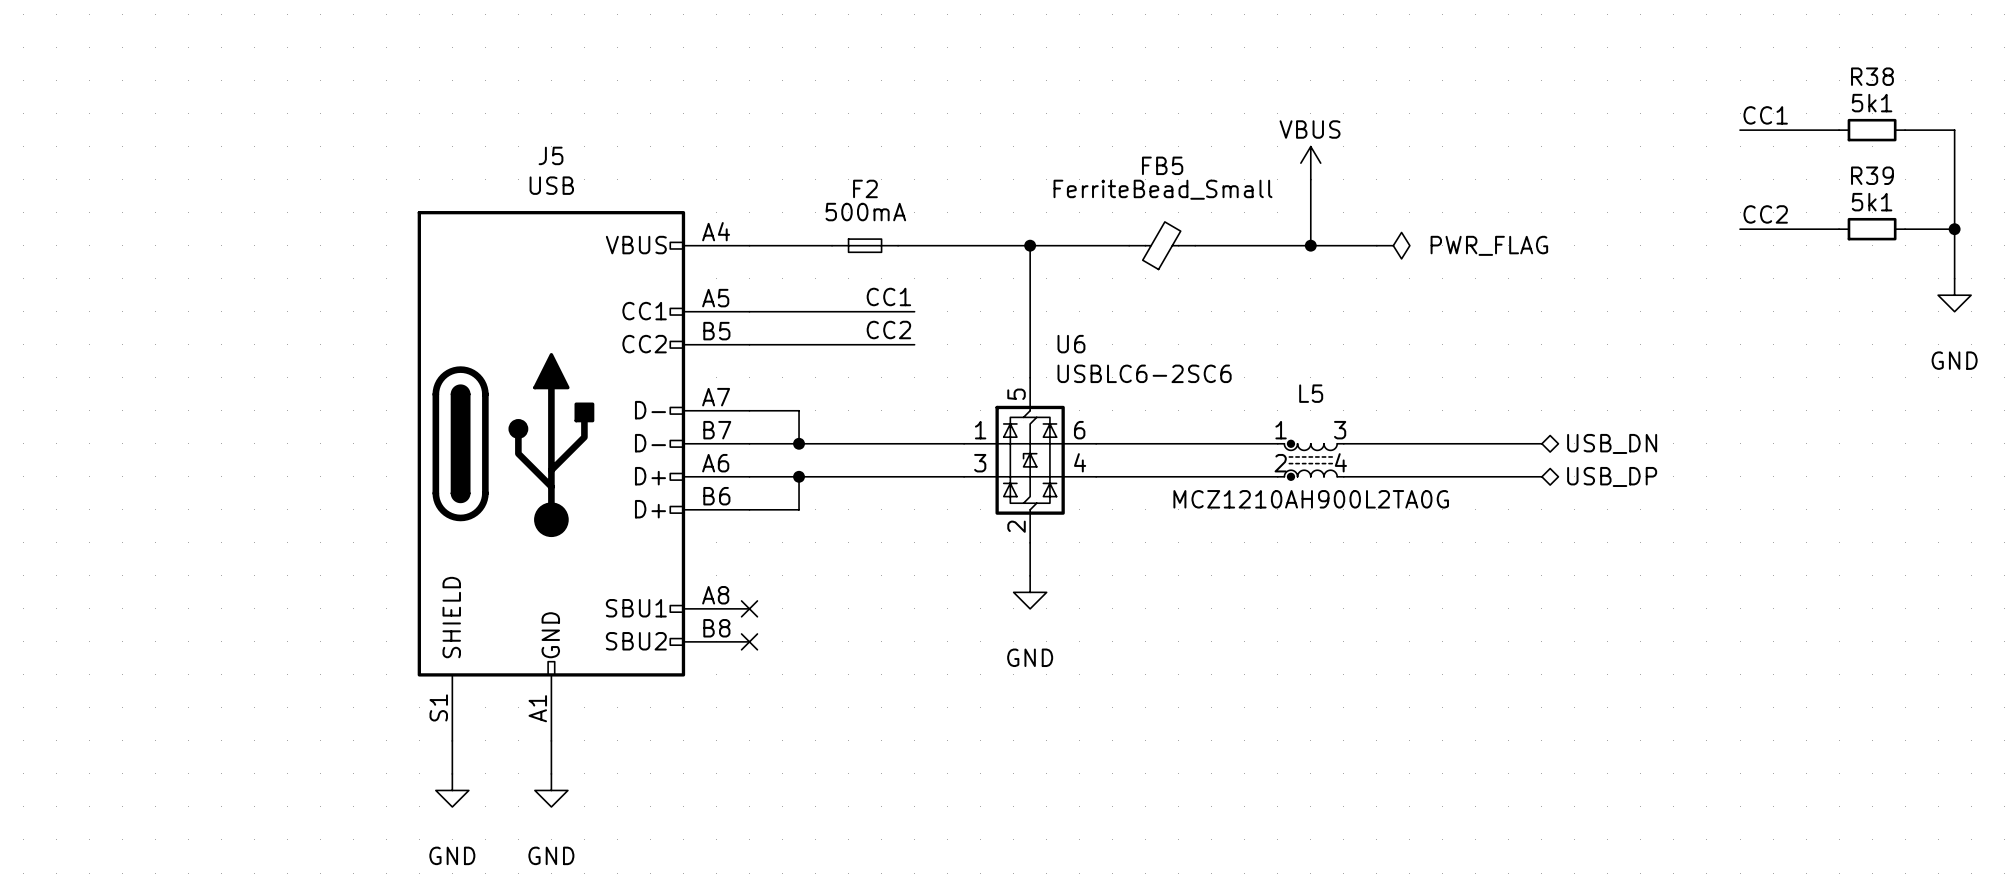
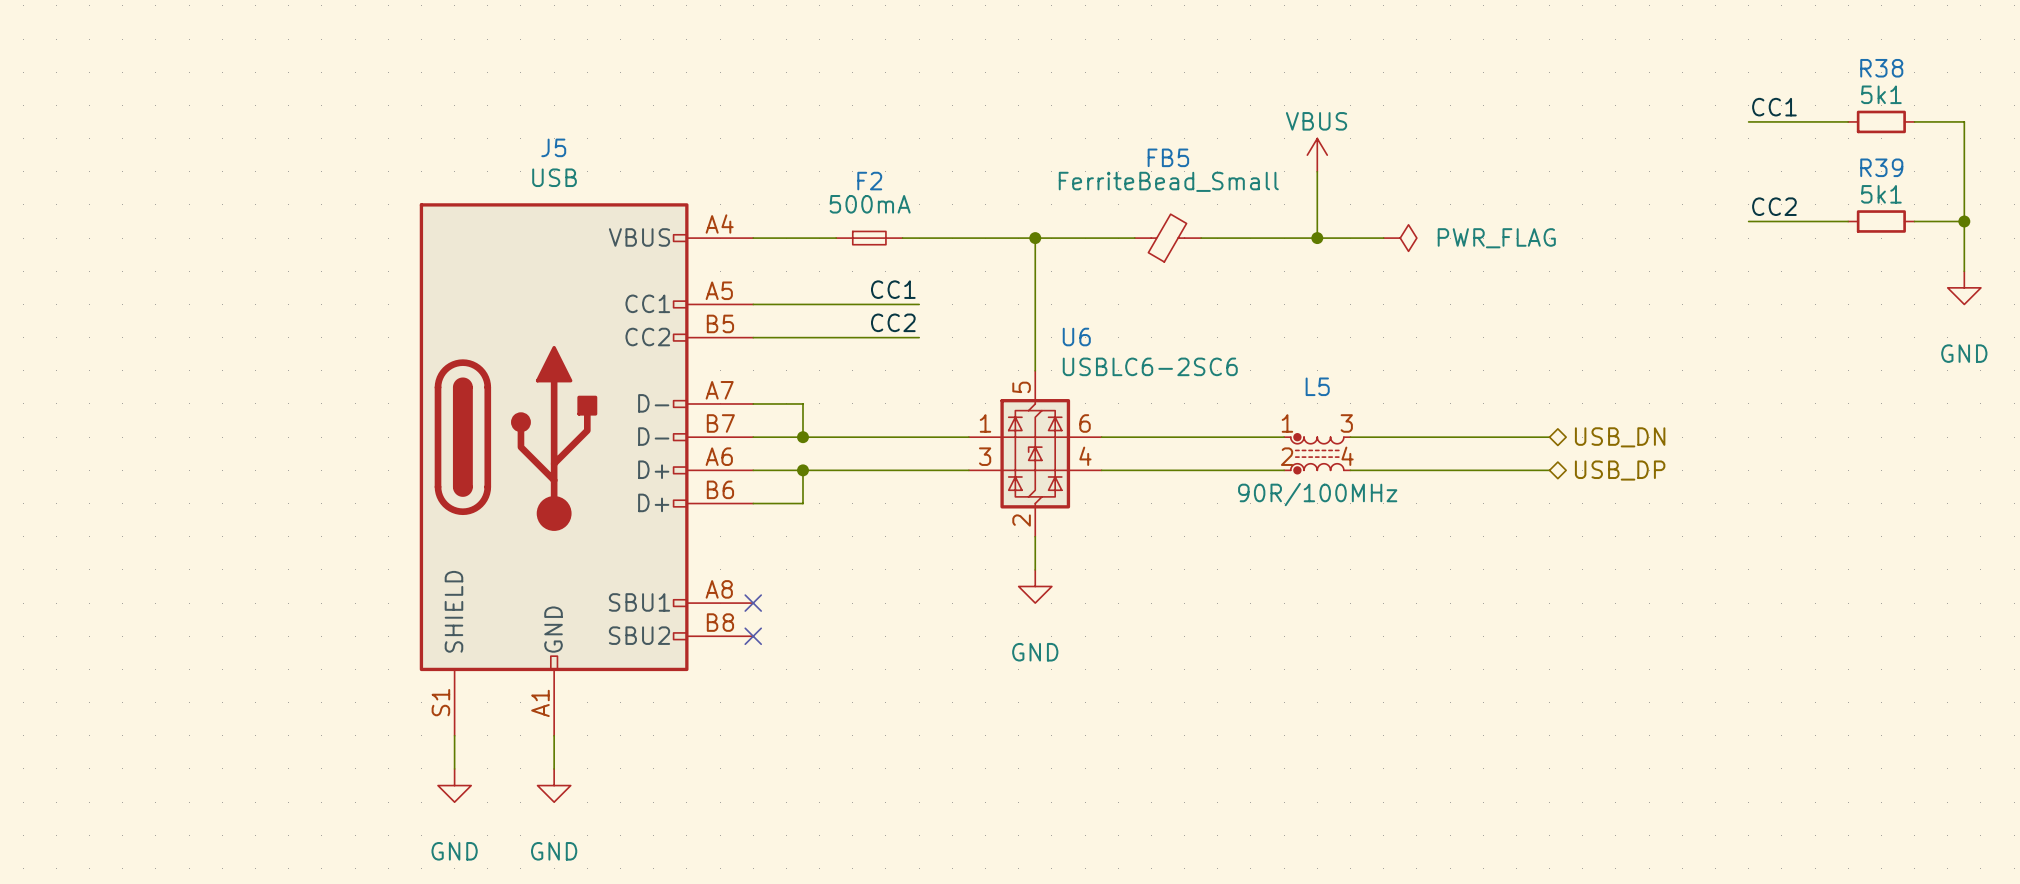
L5 value: MCZ1210AH900L2TA0G (1311, 499) -> 90R/100MHz (1317, 494)

